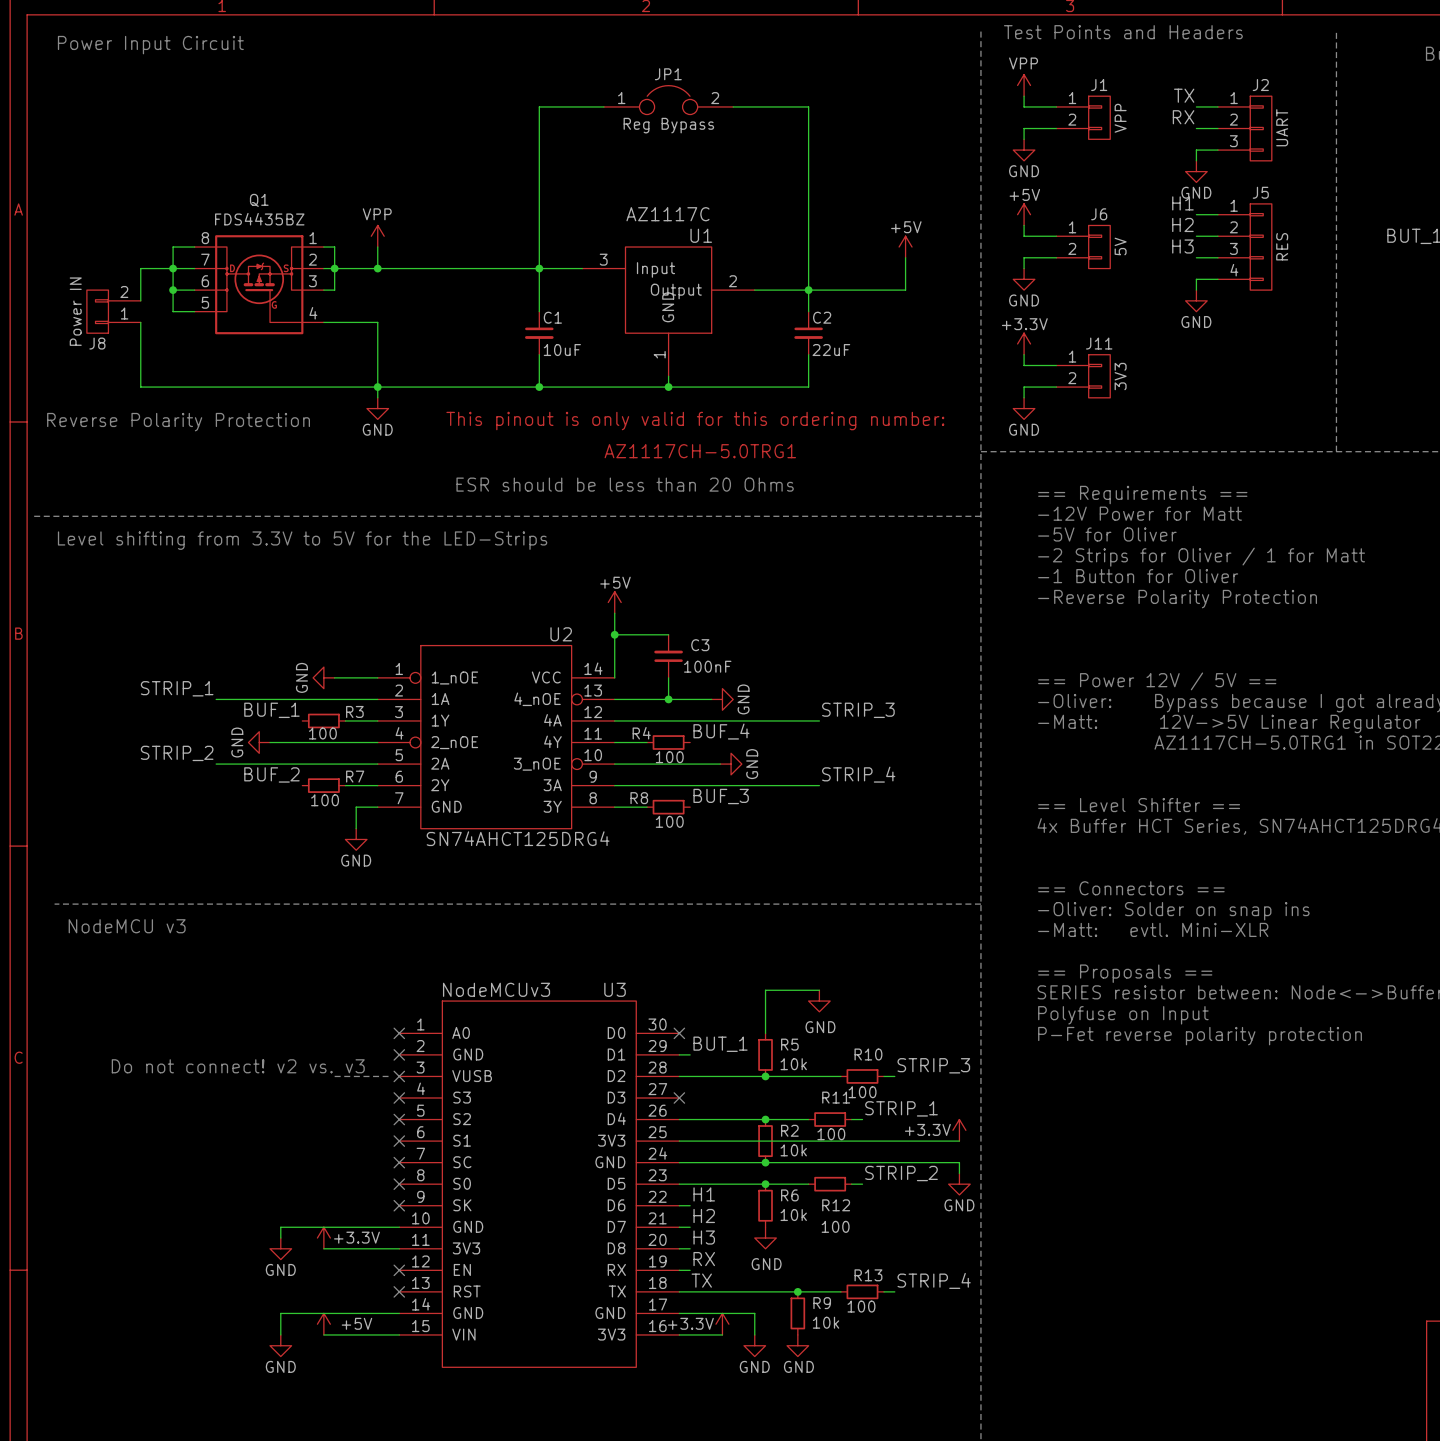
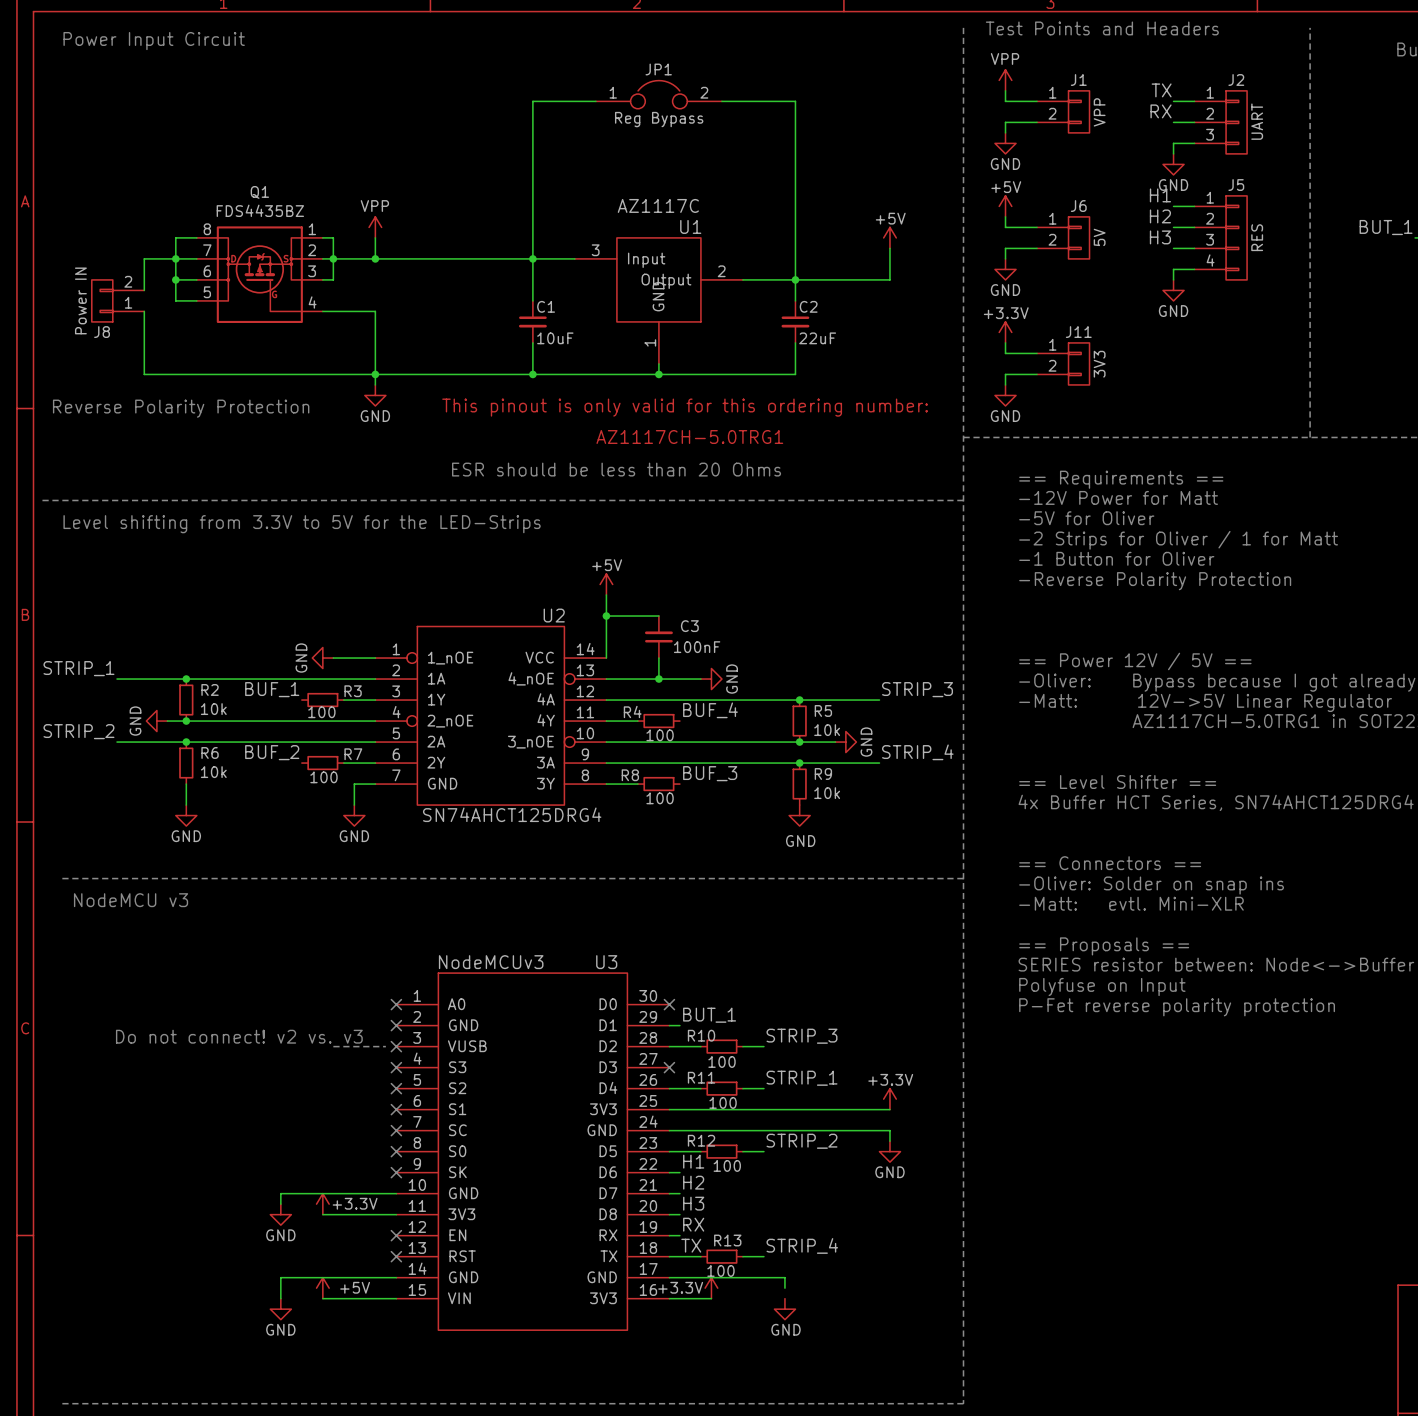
label position: STRIP_1 (177, 688) -> STRIP_1 (78, 668)
wire: none -> (117, 679) (217, 679)
junction: none -> (186, 679)
label position: STRIP_3 (858, 710) -> STRIP_3 (917, 689)
junction: none -> (799, 700)
wire: none -> (805, 700) (879, 700)
power symbol: none -> GND (156, 721)
wire: none -> (167, 721) (270, 721)
junction: none -> (186, 721)
power symbol: GND (259, 742) -> none
label position: STRIP_2 (177, 753) -> STRIP_2 (78, 731)
wire: none -> (117, 742) (217, 742)
junction: none -> (186, 742)
wire: none -> (709, 742) (835, 742)
power symbol: GND (731, 764) -> none
junction: none -> (799, 742)
power symbol: none -> GND (845, 742)
label position: STRIP_4 (858, 774) -> STRIP_4 (917, 752)
junction: none -> (799, 763)
wire: none -> (805, 763) (879, 763)
wire: none -> (186, 784) (186, 805)
power symbol: none -> GND (186, 815)
power symbol: none -> GND (799, 815)
wire: (819, 990) (765, 990) (765, 1033) -> none
power symbol: GND (819, 1001) -> none
R5 position: (765, 1054) -> (799, 721)
R10 name position: R10 (868, 1054) -> R10 (701, 1035)
label position: STRIP_3 (933, 1065) -> STRIP_3 (801, 1036)
wire: (711, 1076) (754, 1076) -> none
junction: (765, 1076) -> none
wire: (776, 1076) (840, 1076) -> none
R10 position: (862, 1076) -> (721, 1046)
wire: (884, 1076) (894, 1076) -> none
R11 name position: R11 (836, 1097) -> R11 (701, 1077)
label position: STRIP_1 (901, 1108) -> STRIP_1 (801, 1078)
wire: (711, 1119) (754, 1119) -> none
junction: (765, 1119) -> none
wire: (776, 1119) (808, 1119) -> none
R11 position: (830, 1119) -> (721, 1088)
wire: (851, 1119) (862, 1119) -> none
power symbol text position: +3.3V (927, 1129) -> +3.3V (890, 1079)
power symbol position: +3.3V (959, 1130) -> +3.3V (889, 1099)
R2 position: (765, 1141) -> (186, 700)
wire: (905, 1141) (959, 1141) -> none
junction: (765, 1162) -> none
wire: (905, 1162) (959, 1162) (959, 1173) -> (889, 1130) (889, 1141)
label position: STRIP_2 (901, 1173) -> STRIP_2 (801, 1141)
wire: (711, 1184) (754, 1184) -> none
junction: (765, 1184) -> none
wire: (776, 1184) (808, 1184) -> none
R12 position: (830, 1184) -> (721, 1151)
wire: (851, 1184) (862, 1184) -> none
power symbol position: GND (959, 1184) -> GND (889, 1151)
R6 position: (765, 1205) -> (186, 763)
R12 name position: R12 (836, 1205) -> R12 (701, 1140)
R12 value position: 100 (835, 1226) -> 100 (727, 1165)
power symbol: GND (765, 1238) -> none
label position: STRIP_4 (934, 1280) -> STRIP_4 (802, 1245)
wire: (711, 1291) (754, 1291) -> none
wire: (776, 1291) (840, 1291) -> none
junction: (797, 1291) -> none
R13 position: (862, 1291) -> (721, 1256)
wire: (884, 1291) (894, 1291) -> none
wire: (754, 1313) (754, 1334) -> (742, 1277) (784, 1277) (784, 1288)
R9 position: (797, 1313) -> (799, 784)
power symbol: GND (754, 1345) -> none

